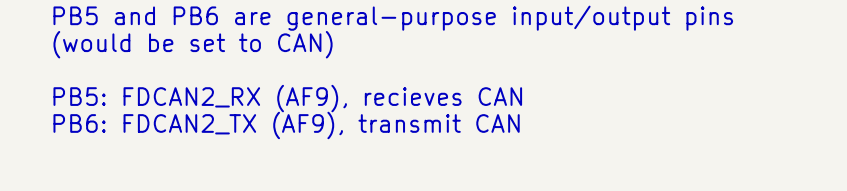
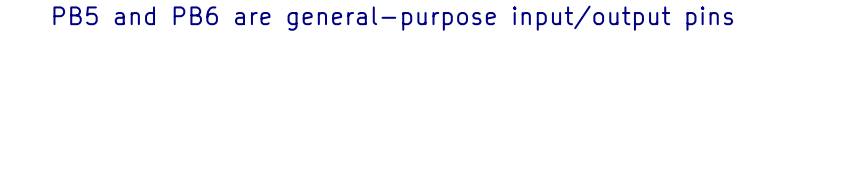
text: (would be set to CAN) (193, 44) -> none
text: PB5: FDCAN2_RX (AF9), recieves CAN (287, 98) -> none
text: PB6: FDCAN2_TX (AF9), transmit CAN (286, 125) -> none

